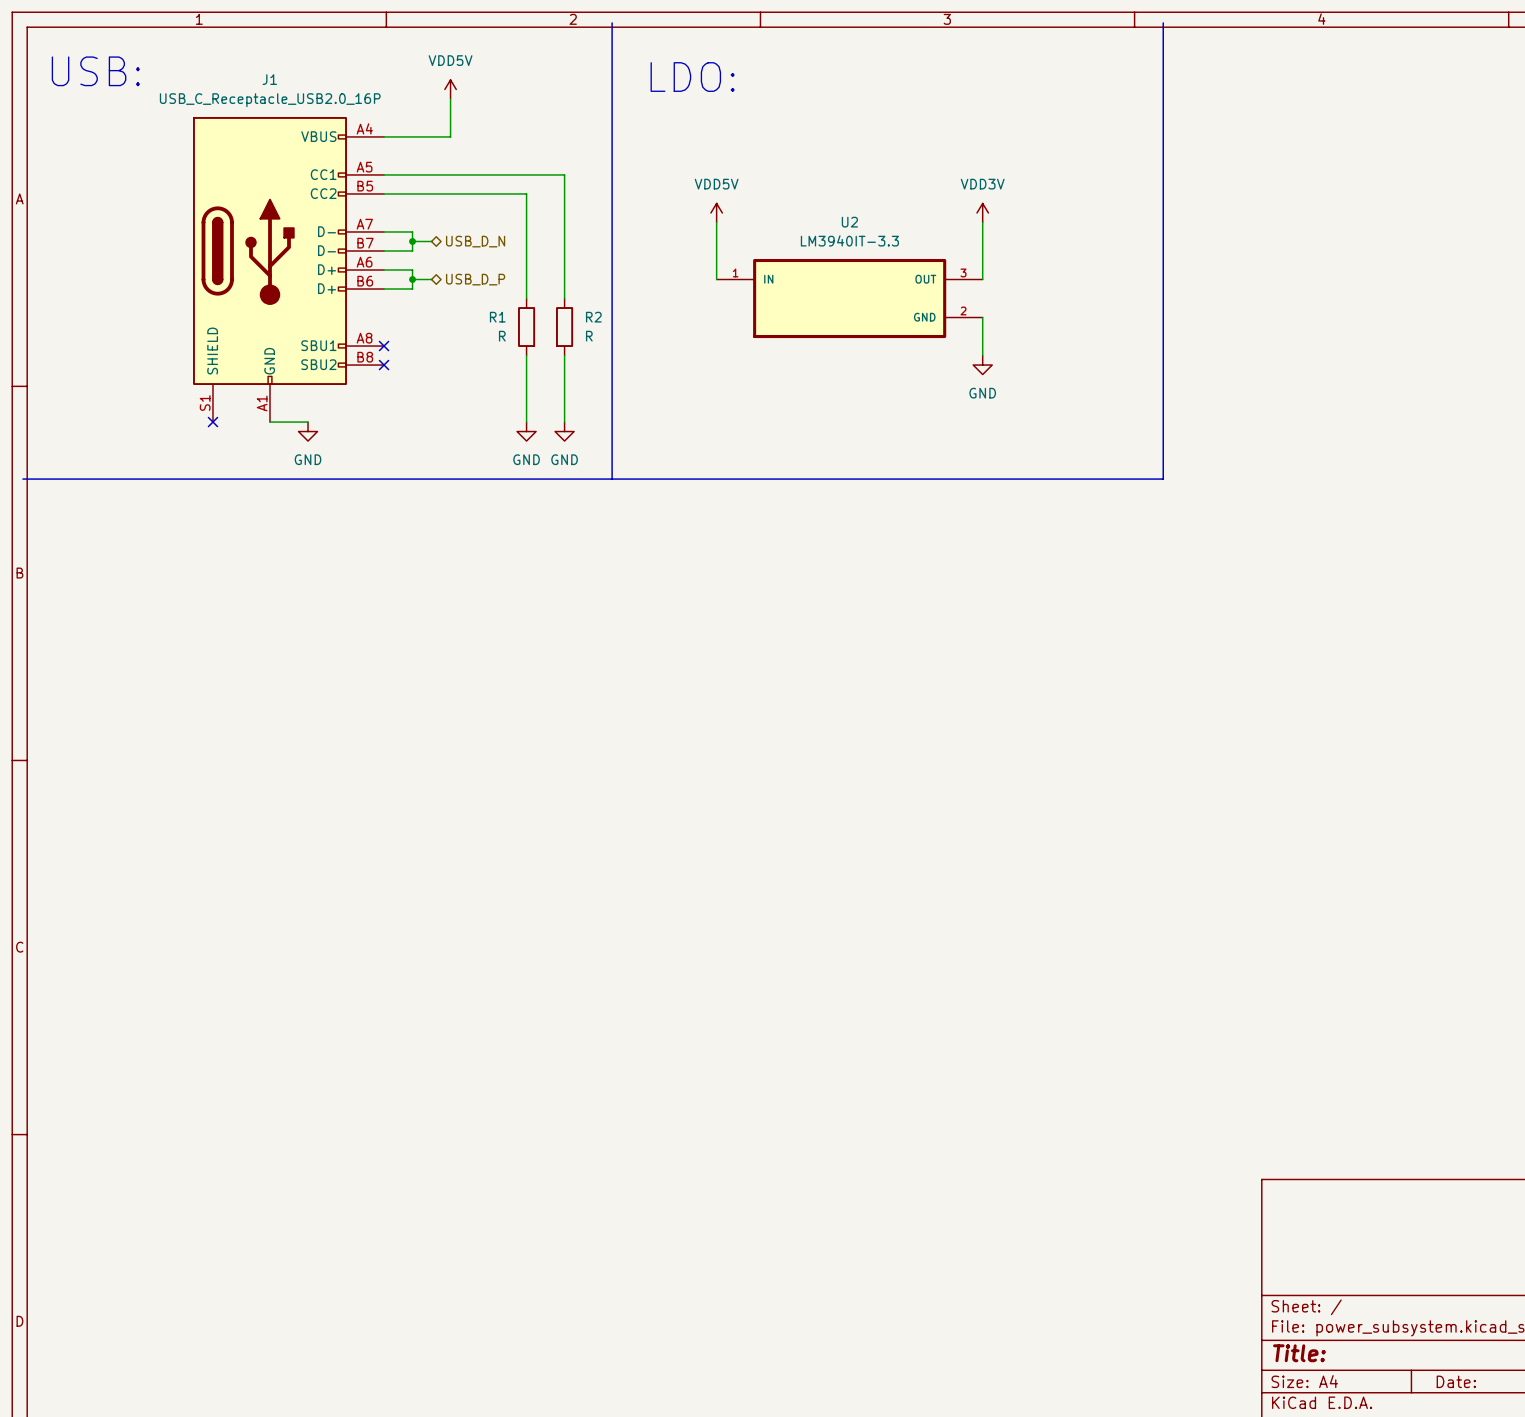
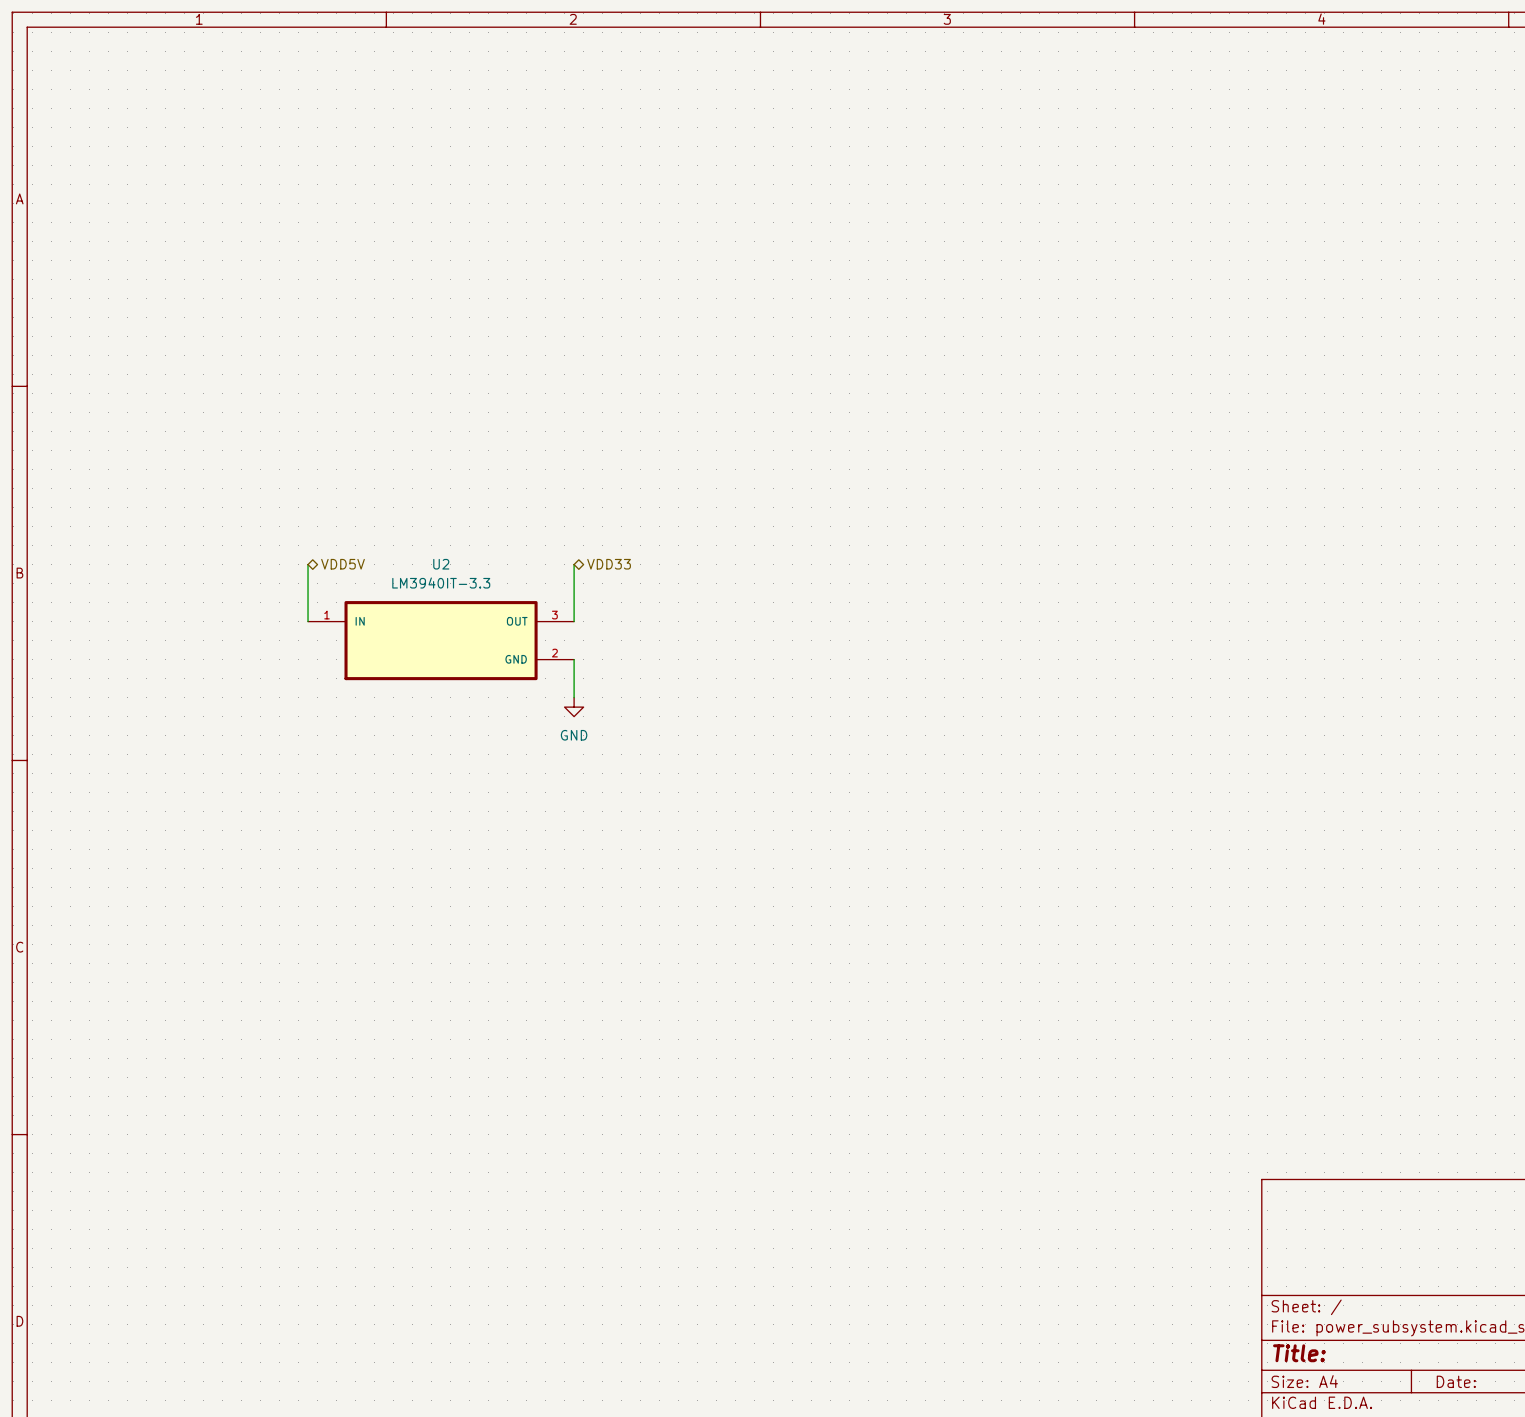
line: (612, 22) (612, 479) -> none
line: (1163, 22) (1163, 479) (22, 479) -> none
text: USB: (95, 71) -> none
text: LDO: (692, 77) -> none
power symbol: VDD5V (450, 89) -> none
wire: (450, 98) (450, 136) (384, 136) -> none
wire: (384, 174) (564, 174) (564, 298) -> none
wire: (384, 193) (526, 193) (526, 298) -> none
power symbol: VDD5V (716, 212) -> none
power symbol: VDD3V (982, 212) -> none
wire: (716, 222) (716, 279) -> none
wire: (982, 222) (982, 279) -> none
wire: (384, 231) (412, 231) (412, 250) (384, 250) -> none
wire: (412, 241) (431, 241) -> none
junction: (412, 241) -> none
hierarchical label: USB_D_N (475, 241) -> none
J1: USB_C_Receptacle_USB2.0_16P (288, 269) -> none
wire: (384, 270) (412, 270) (412, 289) (384, 289) -> none
wire: (412, 279) (431, 279) -> none
junction: (412, 279) -> none
hierarchical label: USB_D_P (475, 279) -> none
U2 position: (849, 298) -> (441, 640)
wire: (982, 317) (982, 355) -> none
R1: R (526, 327) -> none
R2: R (564, 327) -> none
no-connect mark: (384, 346) -> none
wire: (526, 355) (526, 422) -> none
wire: (564, 355) (564, 422) -> none
no-connect mark: (384, 365) -> none
power symbol: GND (982, 365) -> none
no-connect mark: (212, 422) -> none
wire: (270, 422) (308, 422) -> none
power symbol: GND (308, 431) -> none
power symbol: GND (526, 431) -> none
power symbol: GND (564, 431) -> none
wire: none -> (308, 564) (308, 621)
hierarchical label: none -> VDD5V (343, 564)
wire: none -> (574, 564) (574, 621)
hierarchical label: none -> VDD33 (609, 564)
wire: none -> (574, 659) (574, 697)
power symbol: none -> GND (574, 707)

